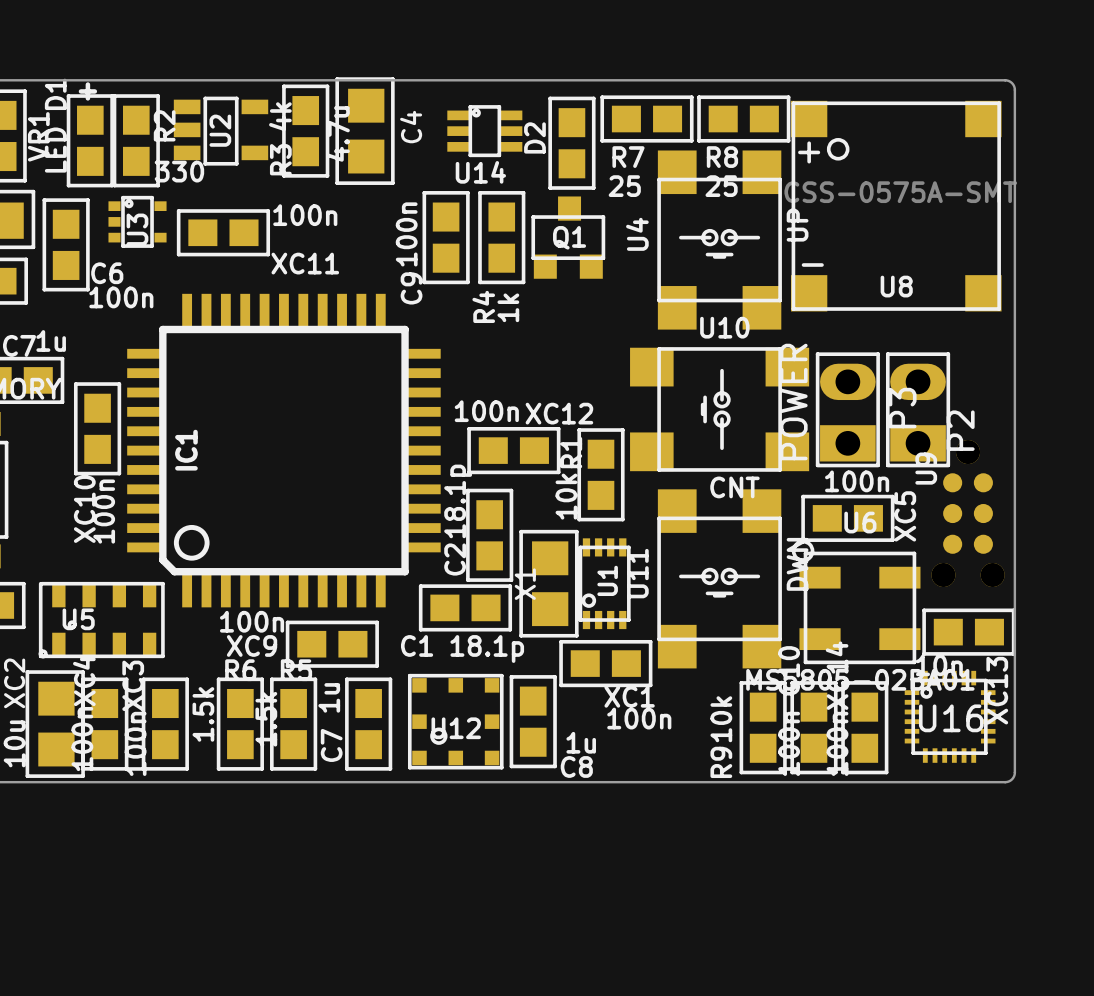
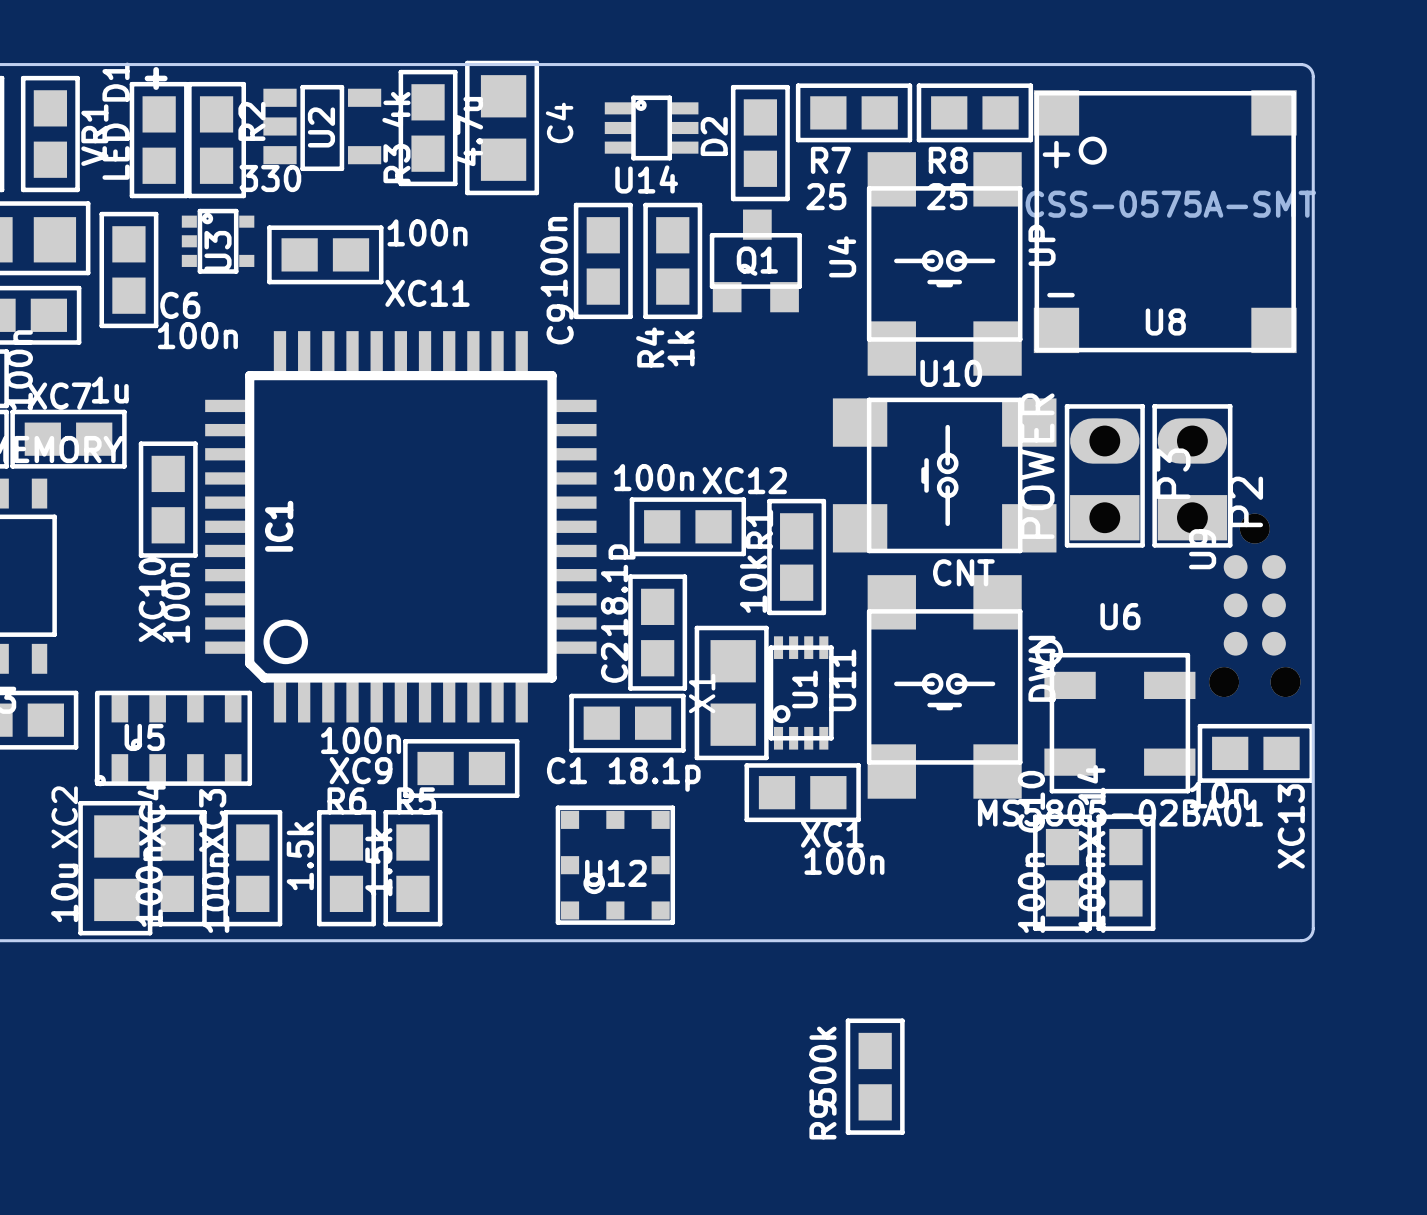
XC5: 100n (847, 518) -> none
U16: (950, 716) -> none
R9 value: 10k (721, 719) -> 500k (822, 1066)
C8: 1u (533, 721) -> none
C7: 1u (368, 724) -> none
R9 position: (763, 727) -> (875, 1076)

